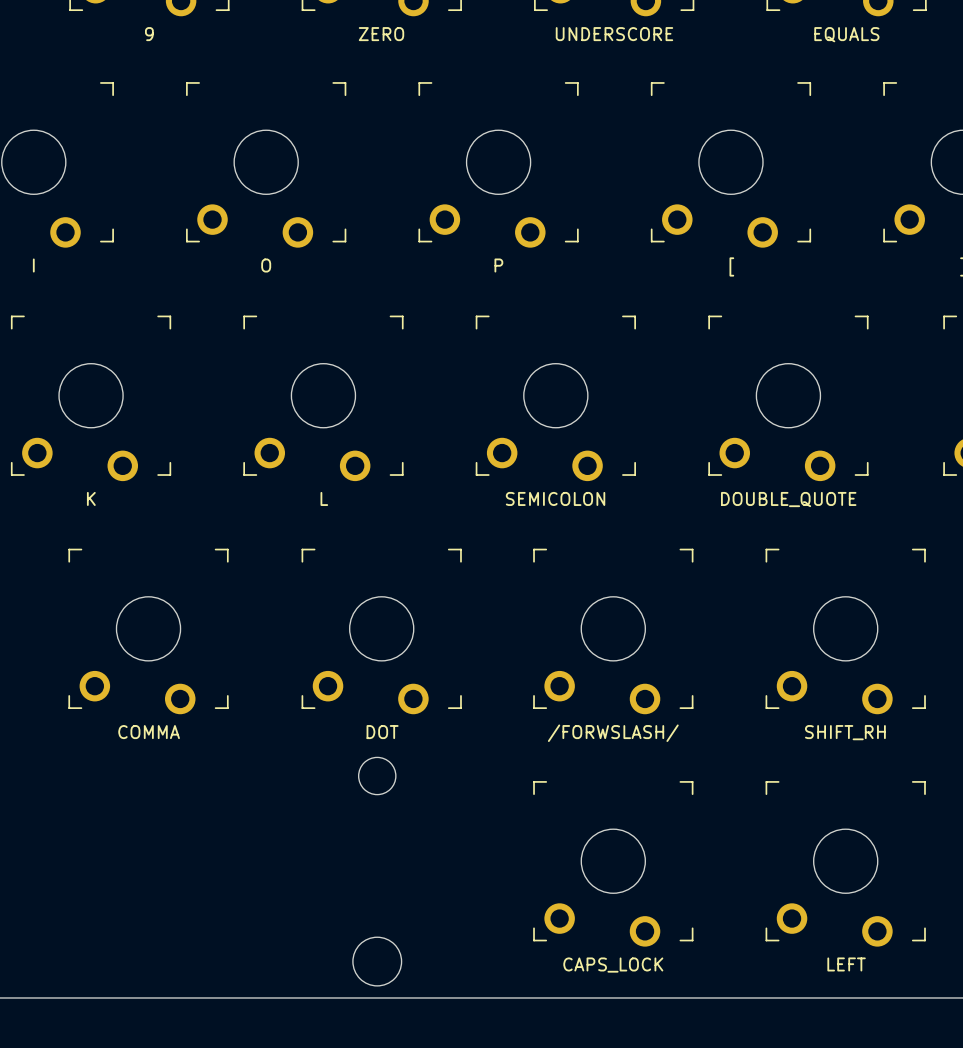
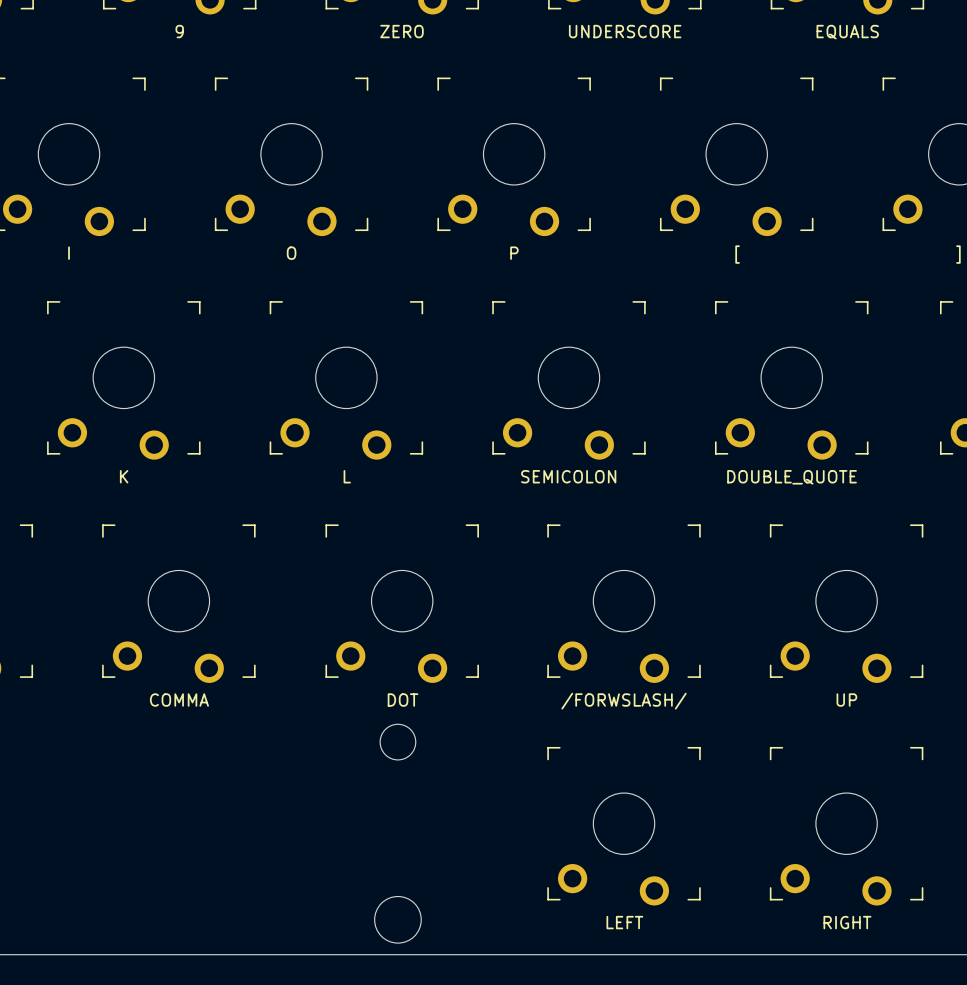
part value: SHIFT_RH (845, 732) -> UP (846, 700)
part value: LEFT (846, 964) -> RIGHT (847, 922)
part value: CAPS_LOCK (613, 965) -> LEFT (624, 922)

